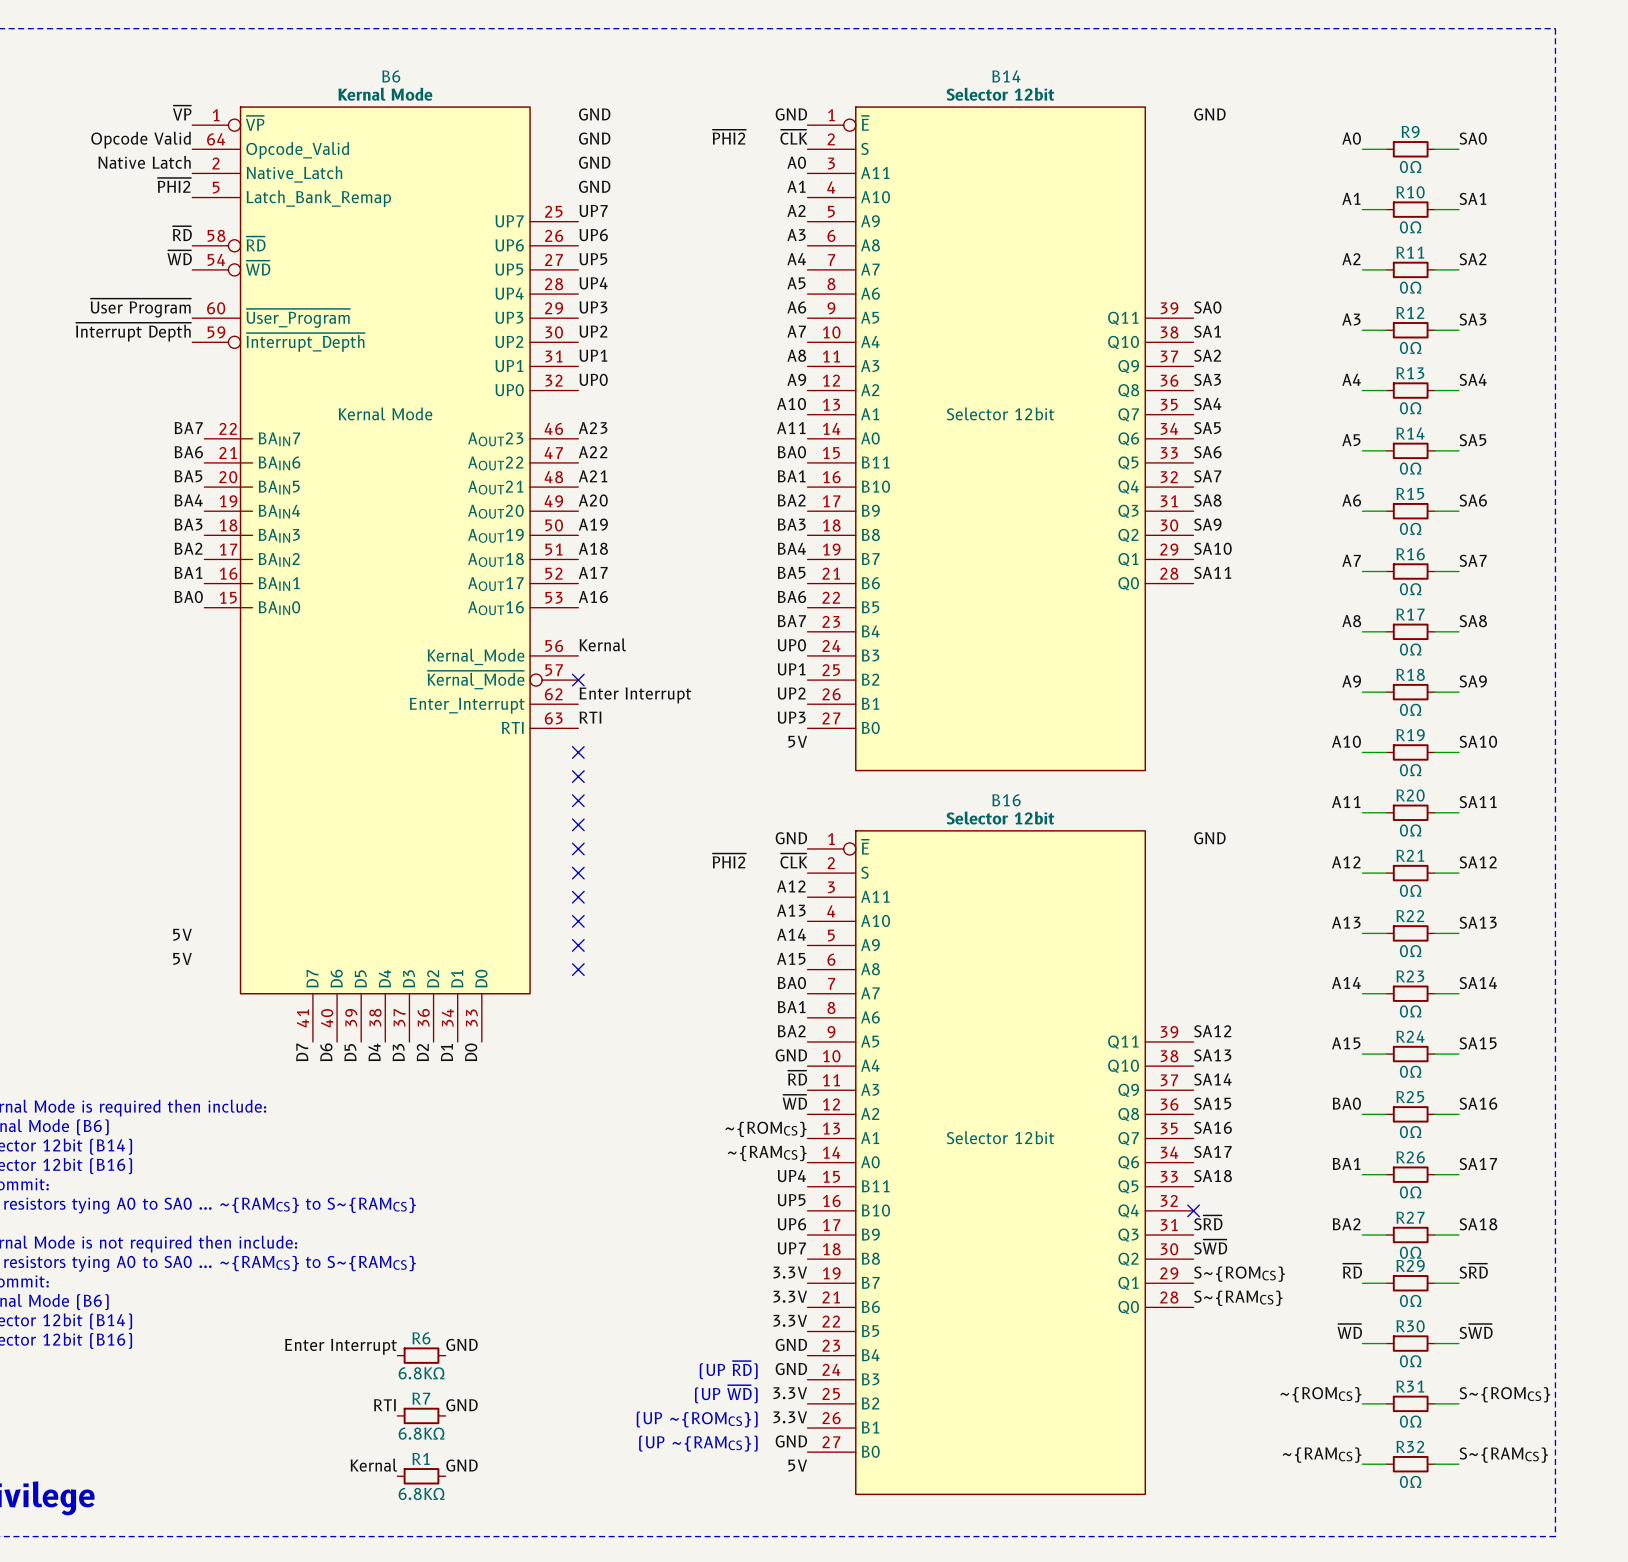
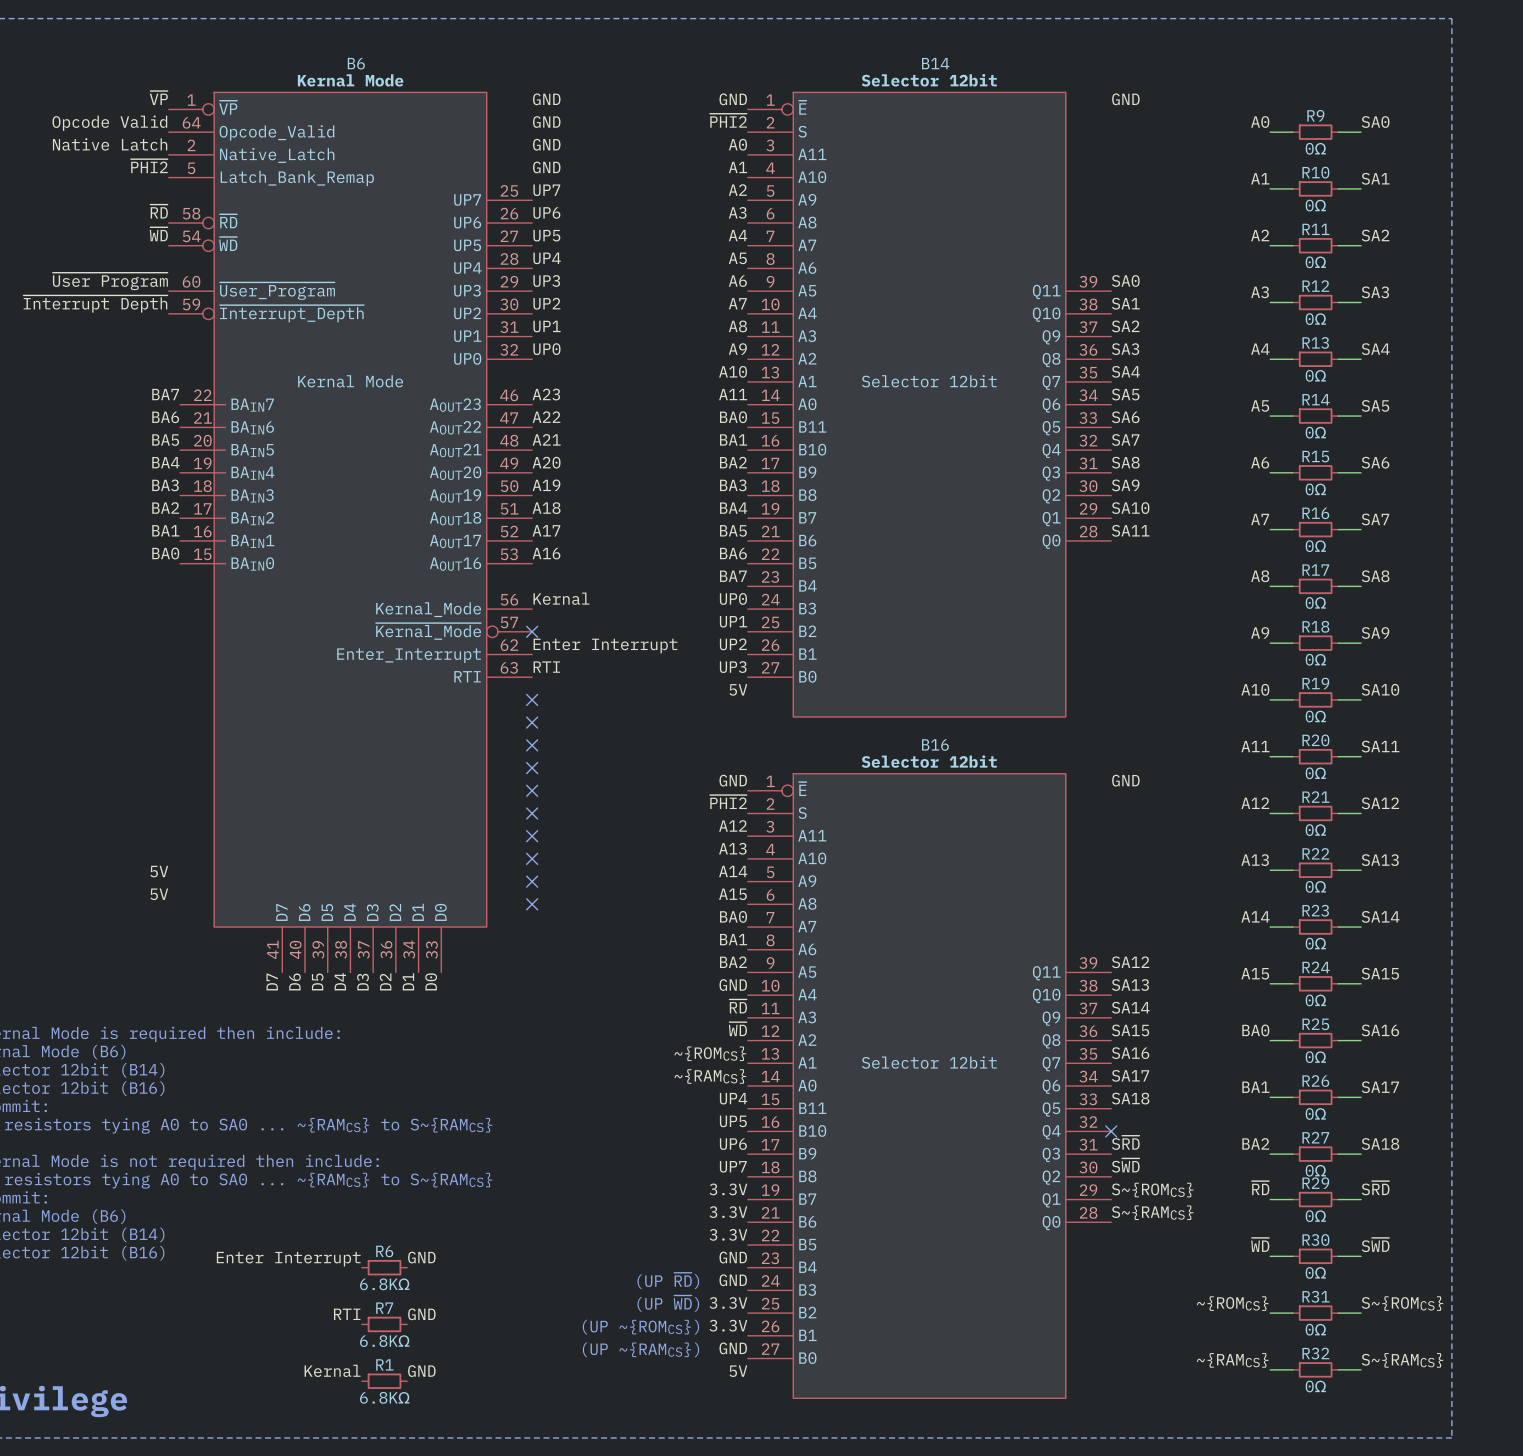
label: ~{PHI2} (729, 137) -> none
label: ~{CLK} (793, 137) -> ~{PHI2} (728, 120)
label: ~{PHI2} (729, 860) -> none
label: ~{CLK} (793, 861) -> ~{PHI2} (728, 802)

